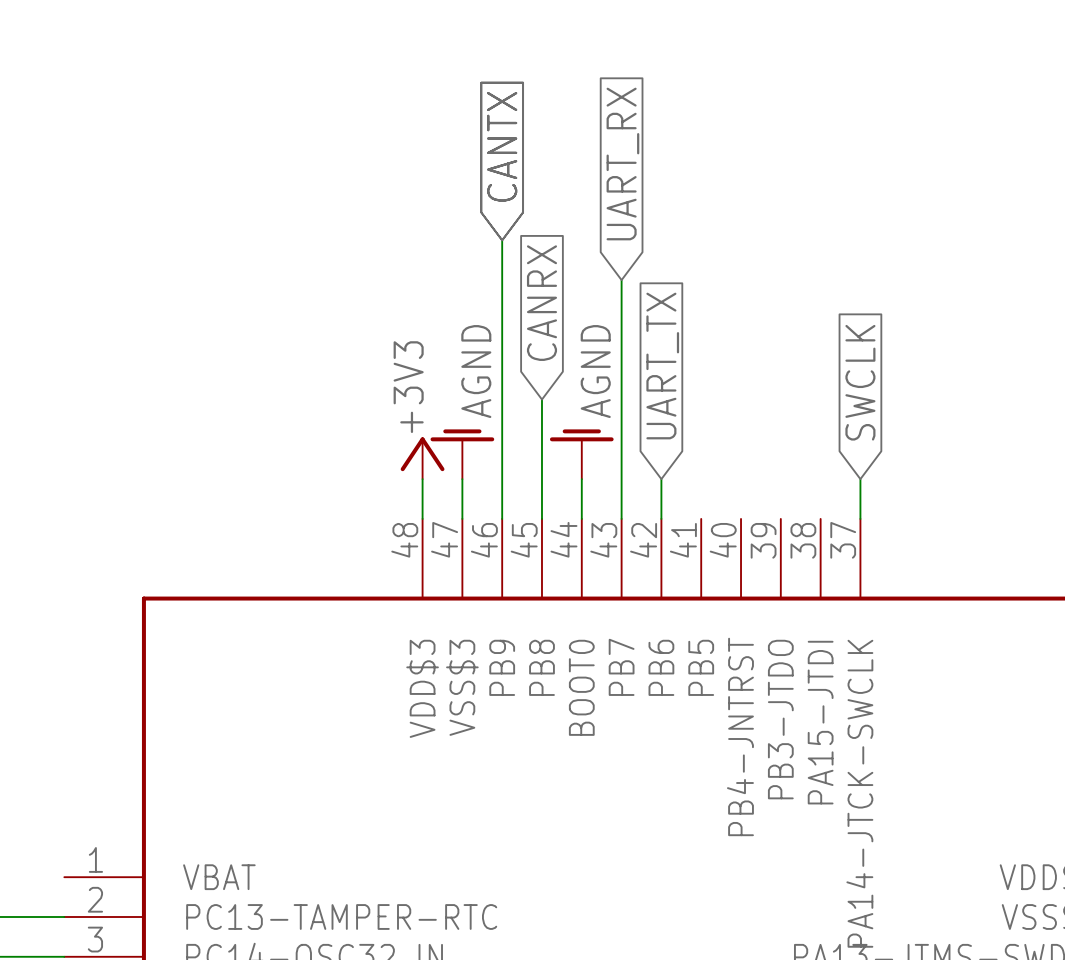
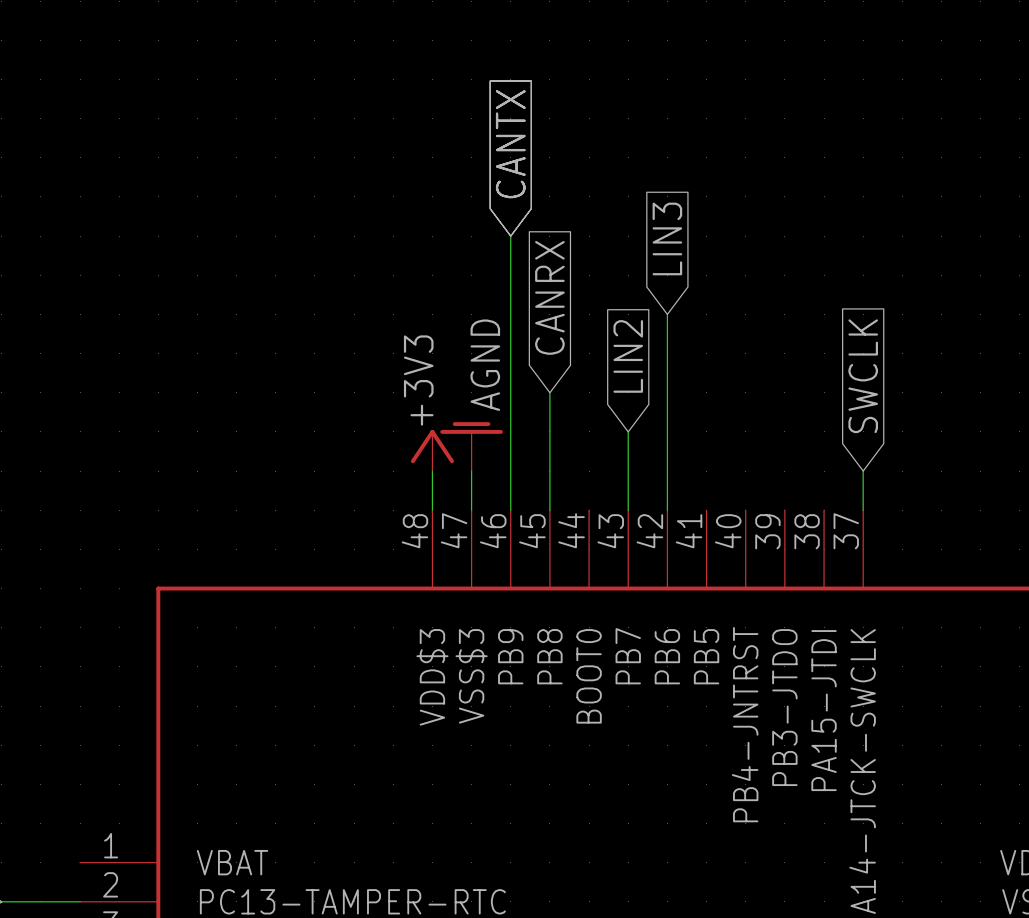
global label: UART_RX (622, 164) -> none
global label: none -> LIN3 (667, 238)
wire: (621, 280) (621, 439) -> (667, 314) (667, 471)
global label: none -> LIN2 (628, 356)
global label: UART_TX (662, 366) -> none
power symbol: AGND (581, 454) -> none
wire: (581, 479) (581, 518) -> none

